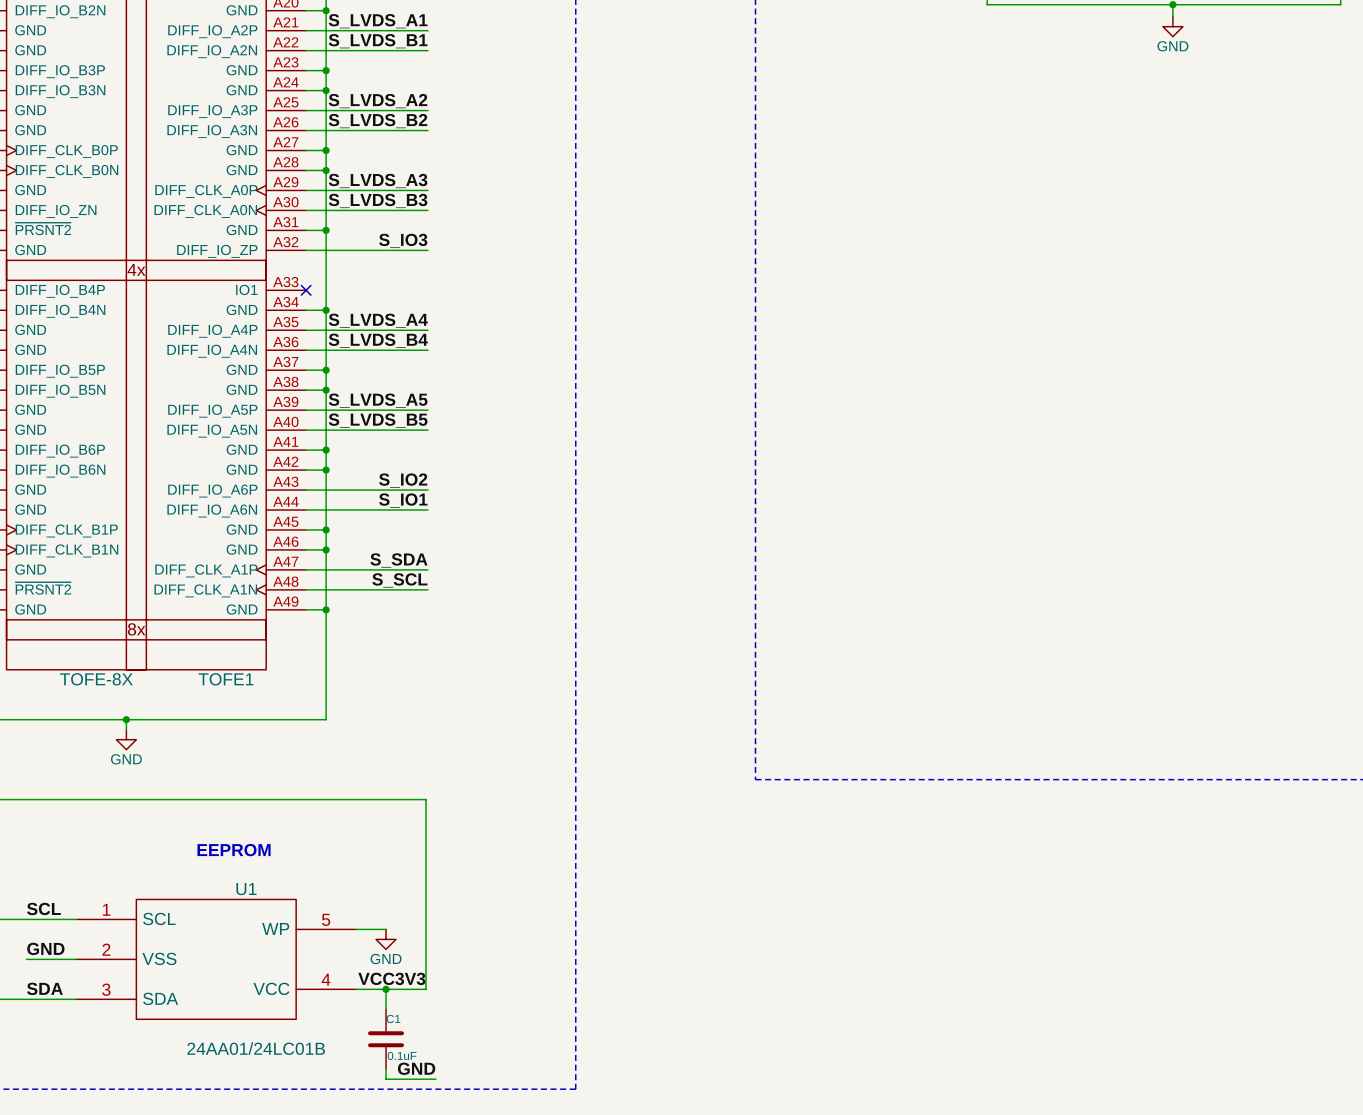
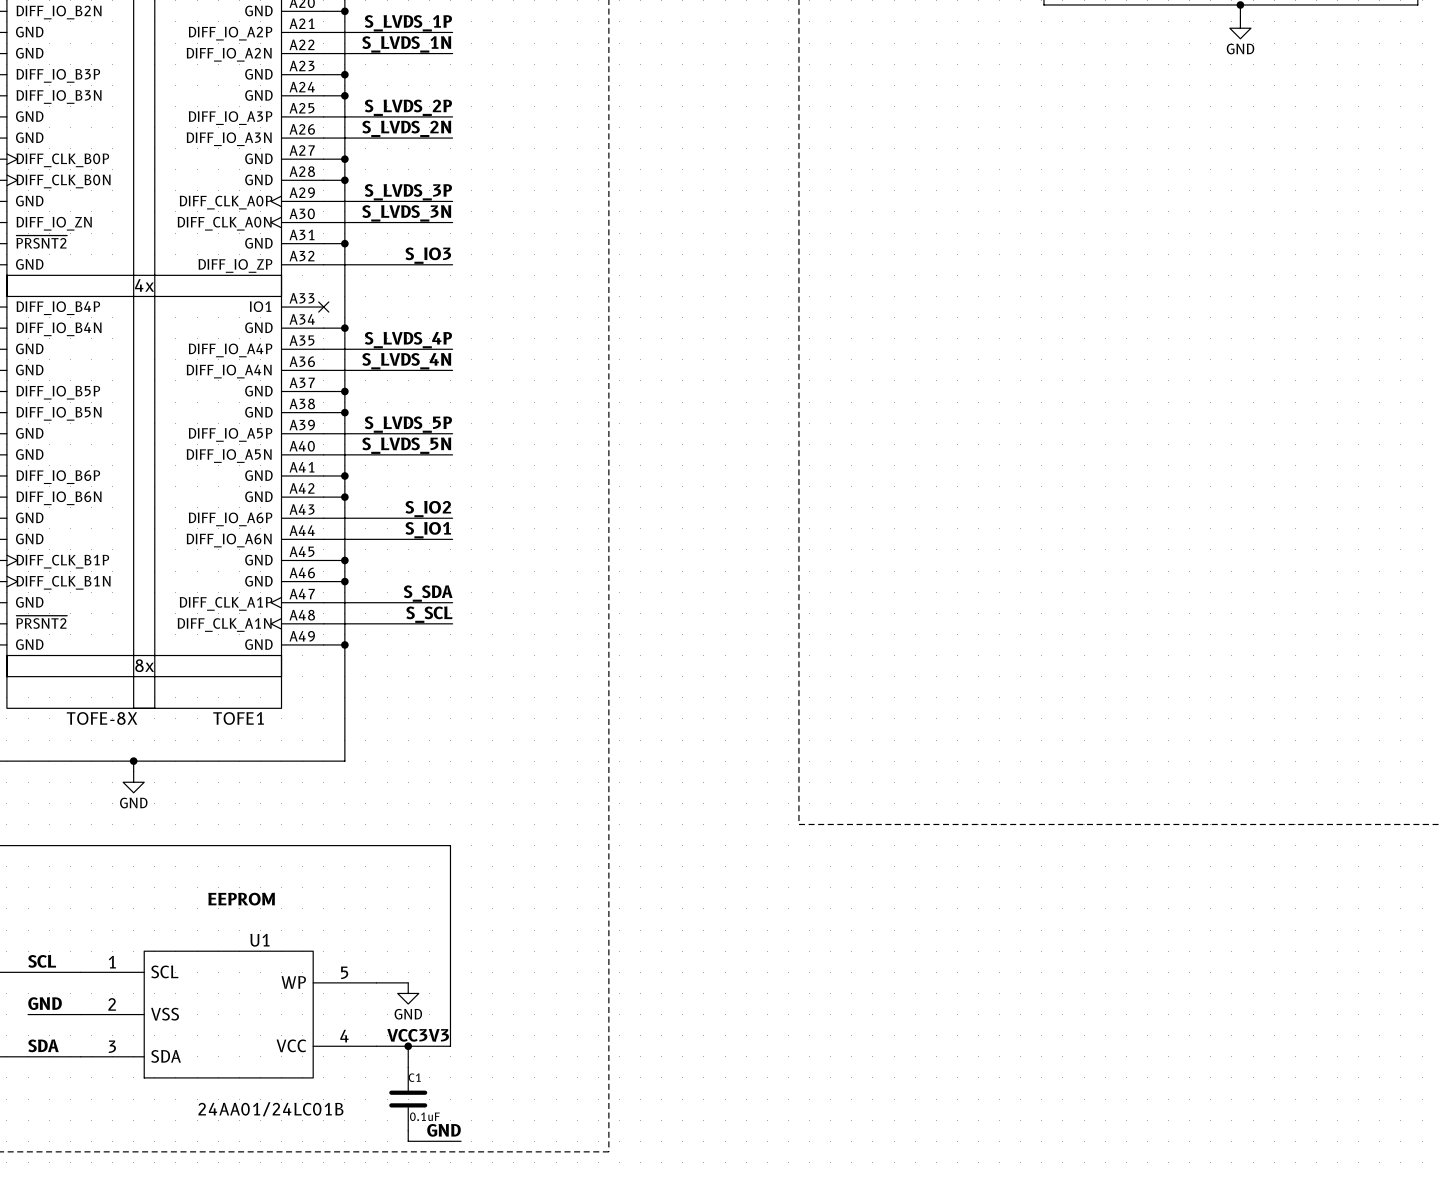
label: S_LVDS_A1 (378, 21) -> S_LVDS_1P (408, 23)
label: S_LVDS_B1 (378, 41) -> S_LVDS_1N (406, 44)
label: S_LVDS_A2 (378, 101) -> S_LVDS_2P (408, 107)
label: S_LVDS_B2 (378, 121) -> S_LVDS_2N (406, 128)
label: S_LVDS_A3 (378, 180) -> S_LVDS_3P (408, 192)
label: S_LVDS_B3 (378, 200) -> S_LVDS_3N (406, 213)
label: S_LVDS_A4 (378, 320) -> S_LVDS_4P (408, 340)
label: S_LVDS_B4 (378, 340) -> S_LVDS_4N (406, 361)
label: S_LVDS_A5 (378, 400) -> S_LVDS_5P (408, 424)
label: S_LVDS_B5 (378, 420) -> S_LVDS_5N (406, 445)

